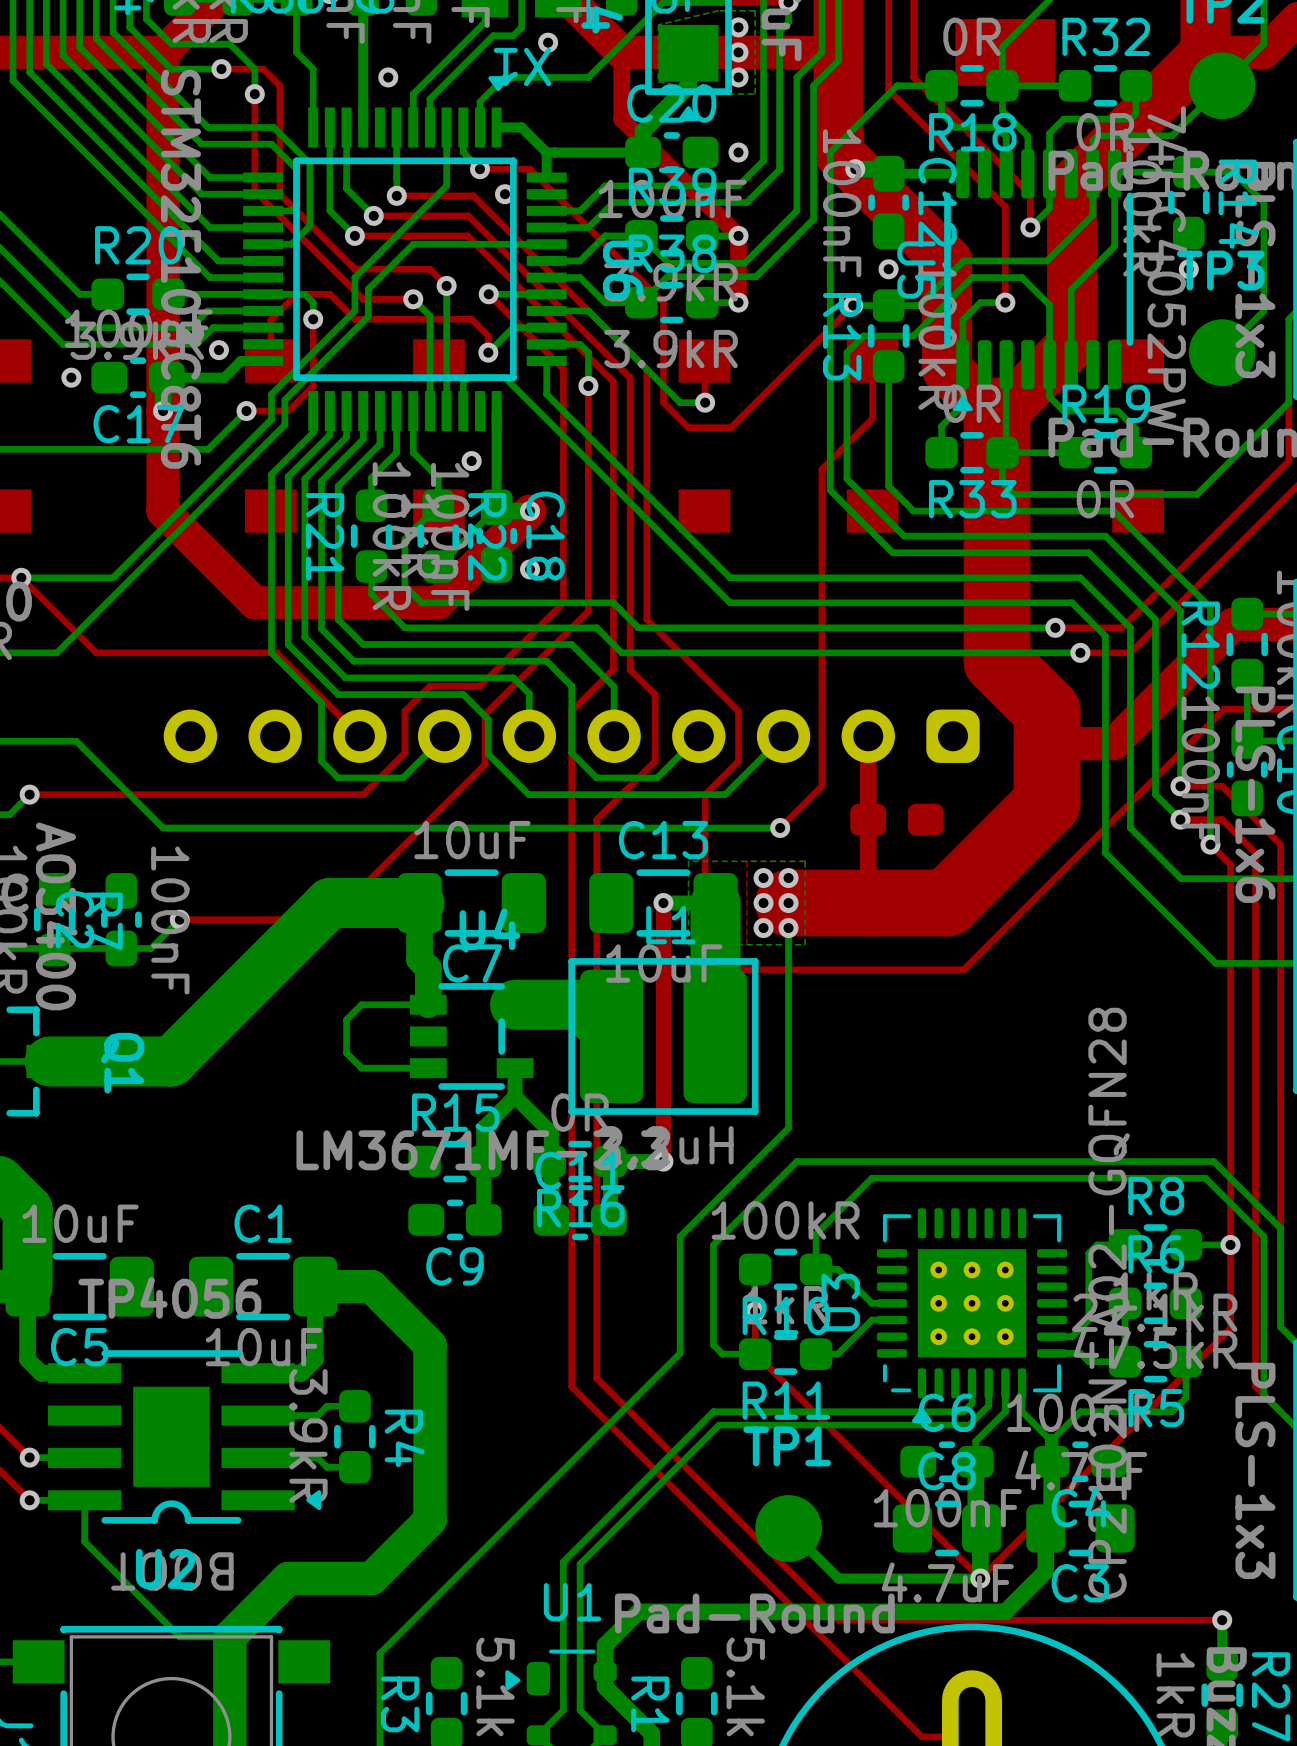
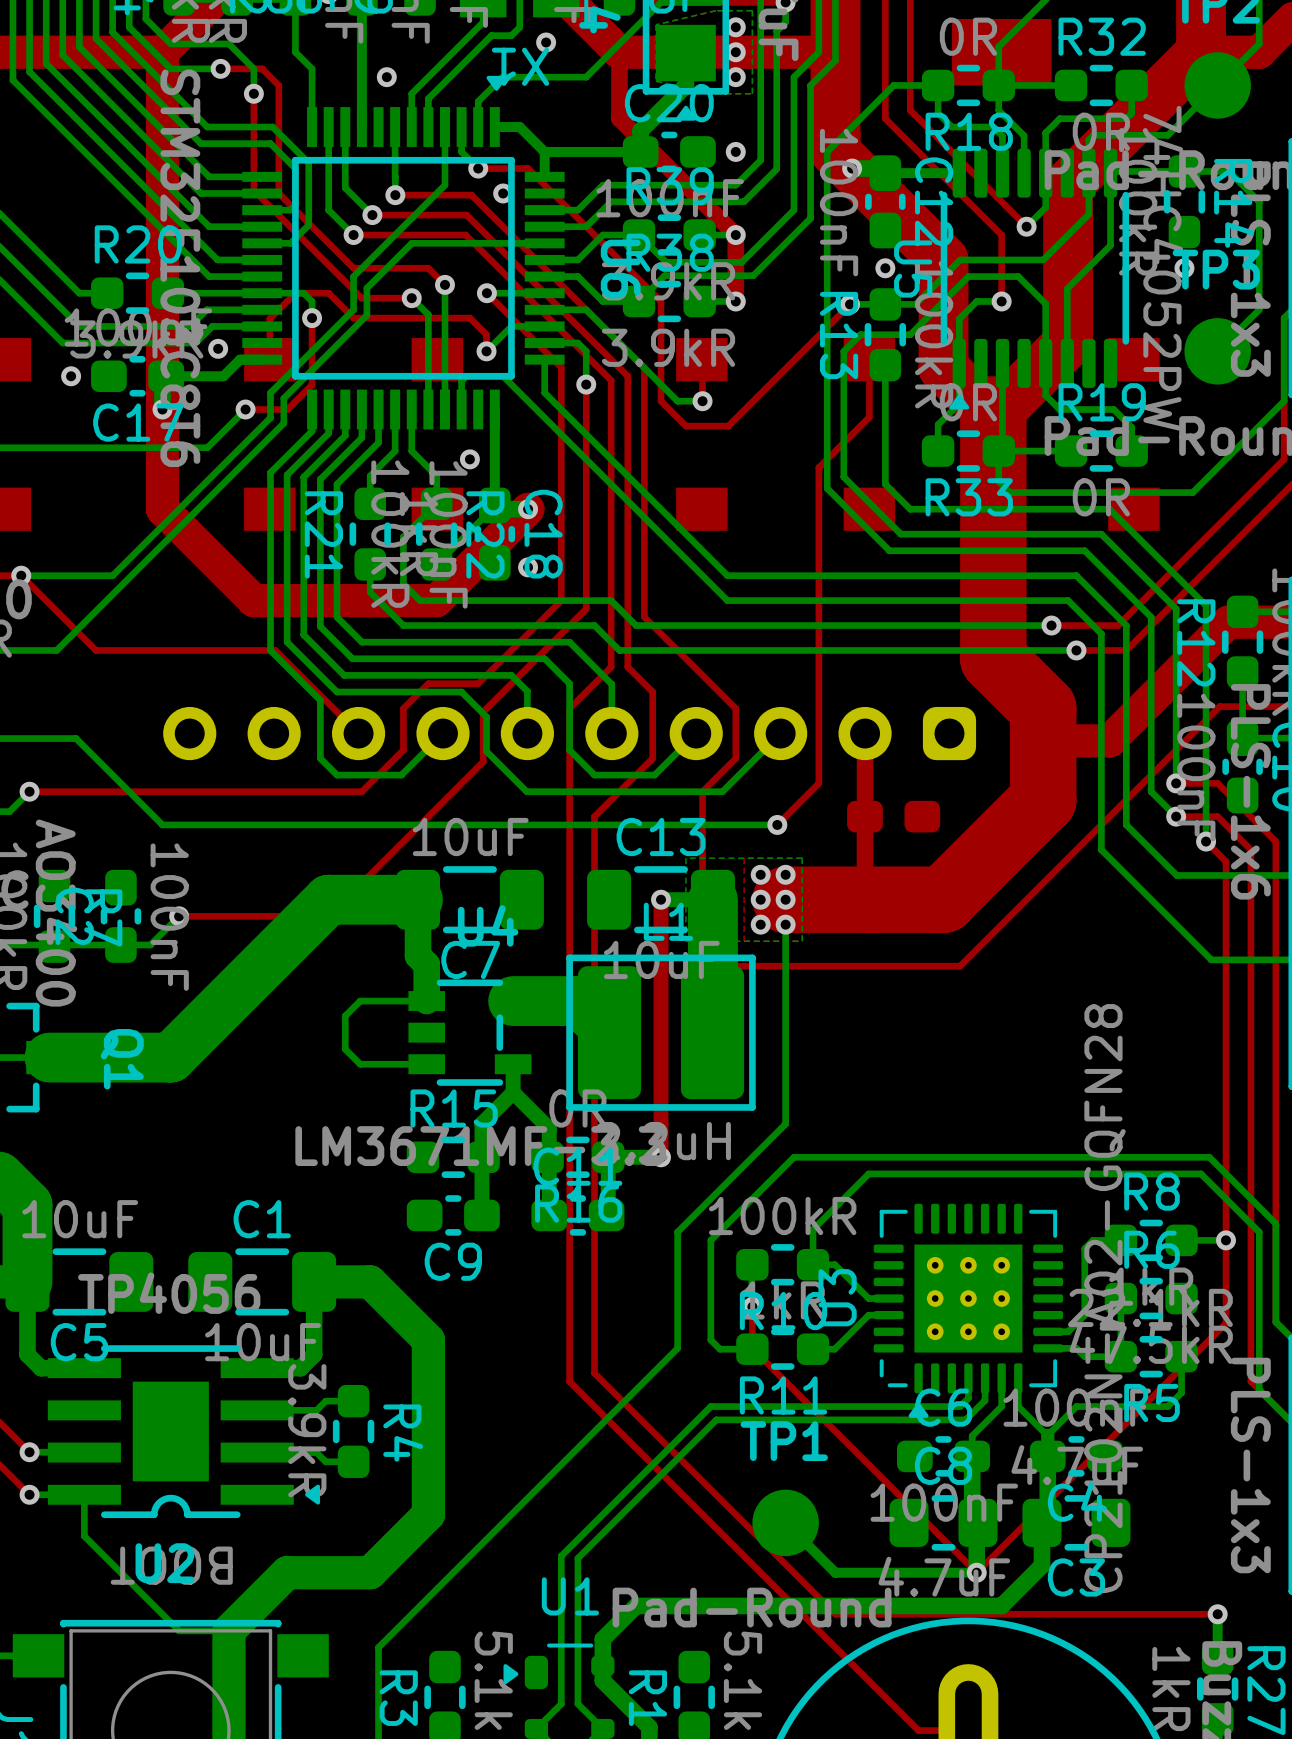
top track: (913, 77) (1030, 194) (1030, 227) -> (910, 77) (910, 110) (1026, 226)
top track: (888, 89) (1005, 206) (1005, 235) -> (885, 89) (885, 118) (1001, 235)

